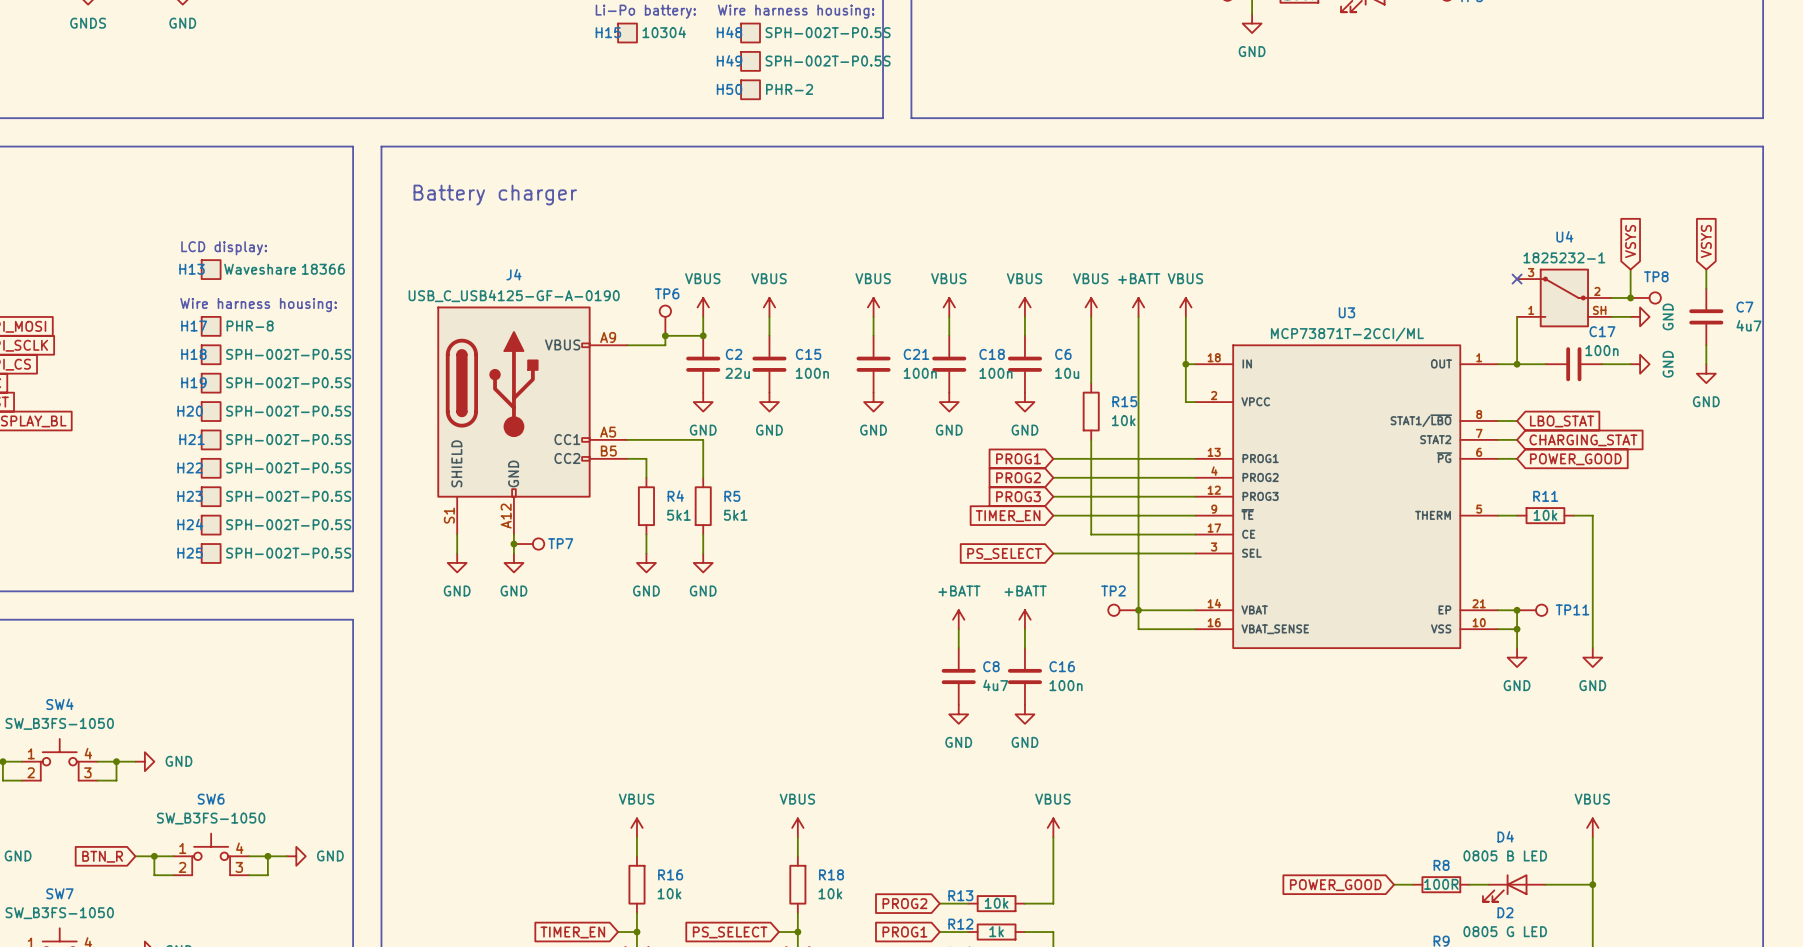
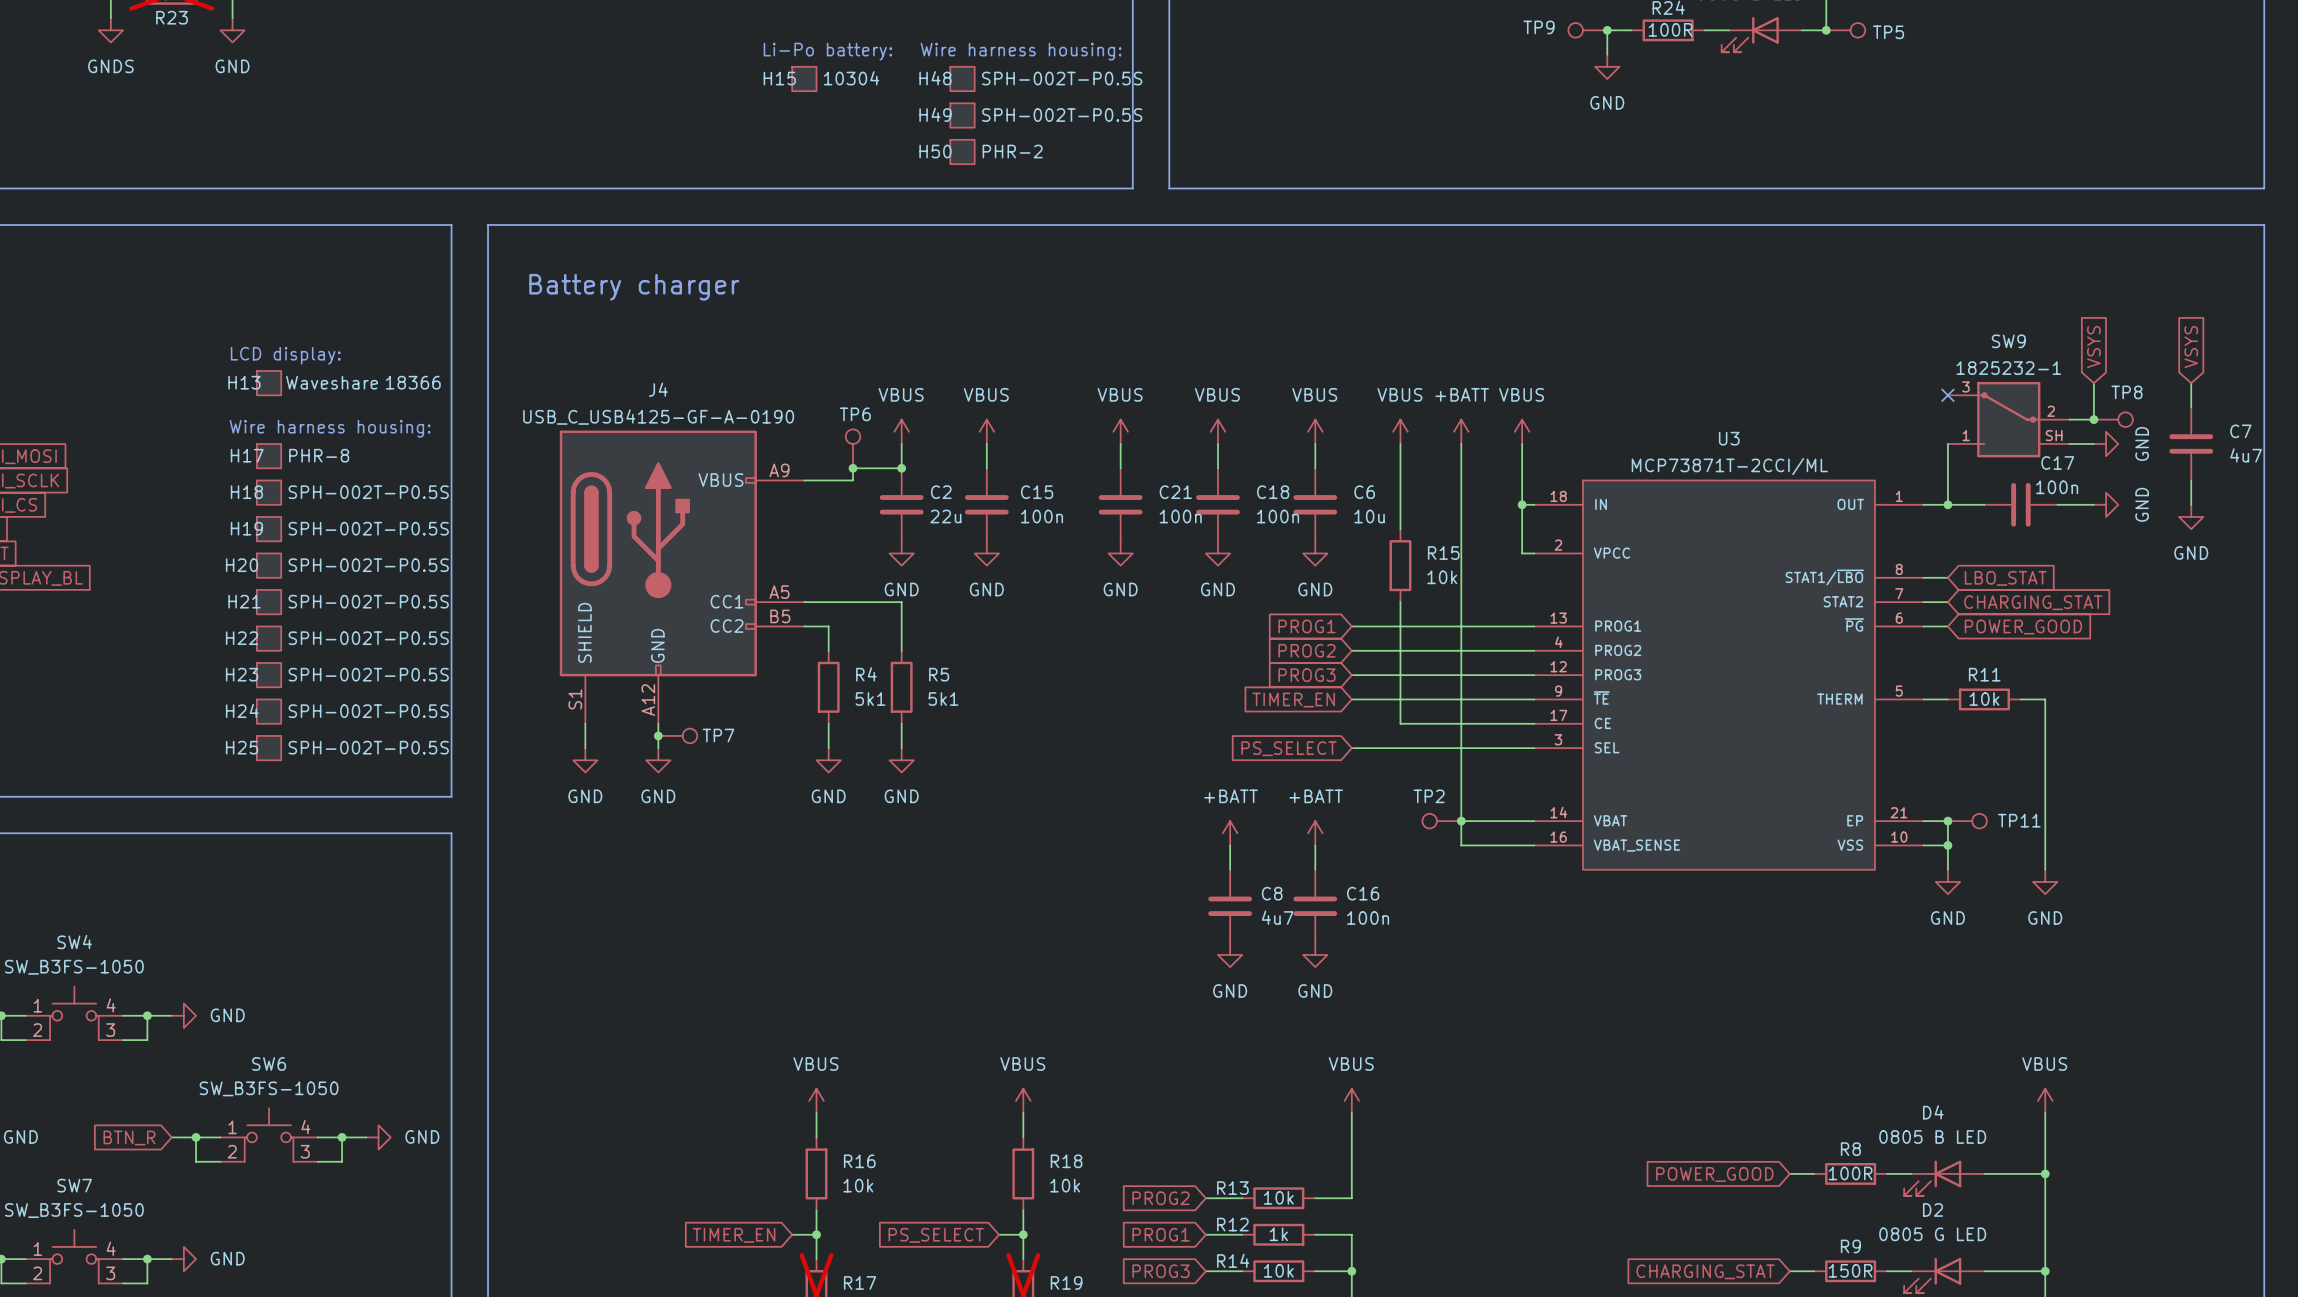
U4 name: U4 (1564, 236) -> SW9 (2008, 341)

